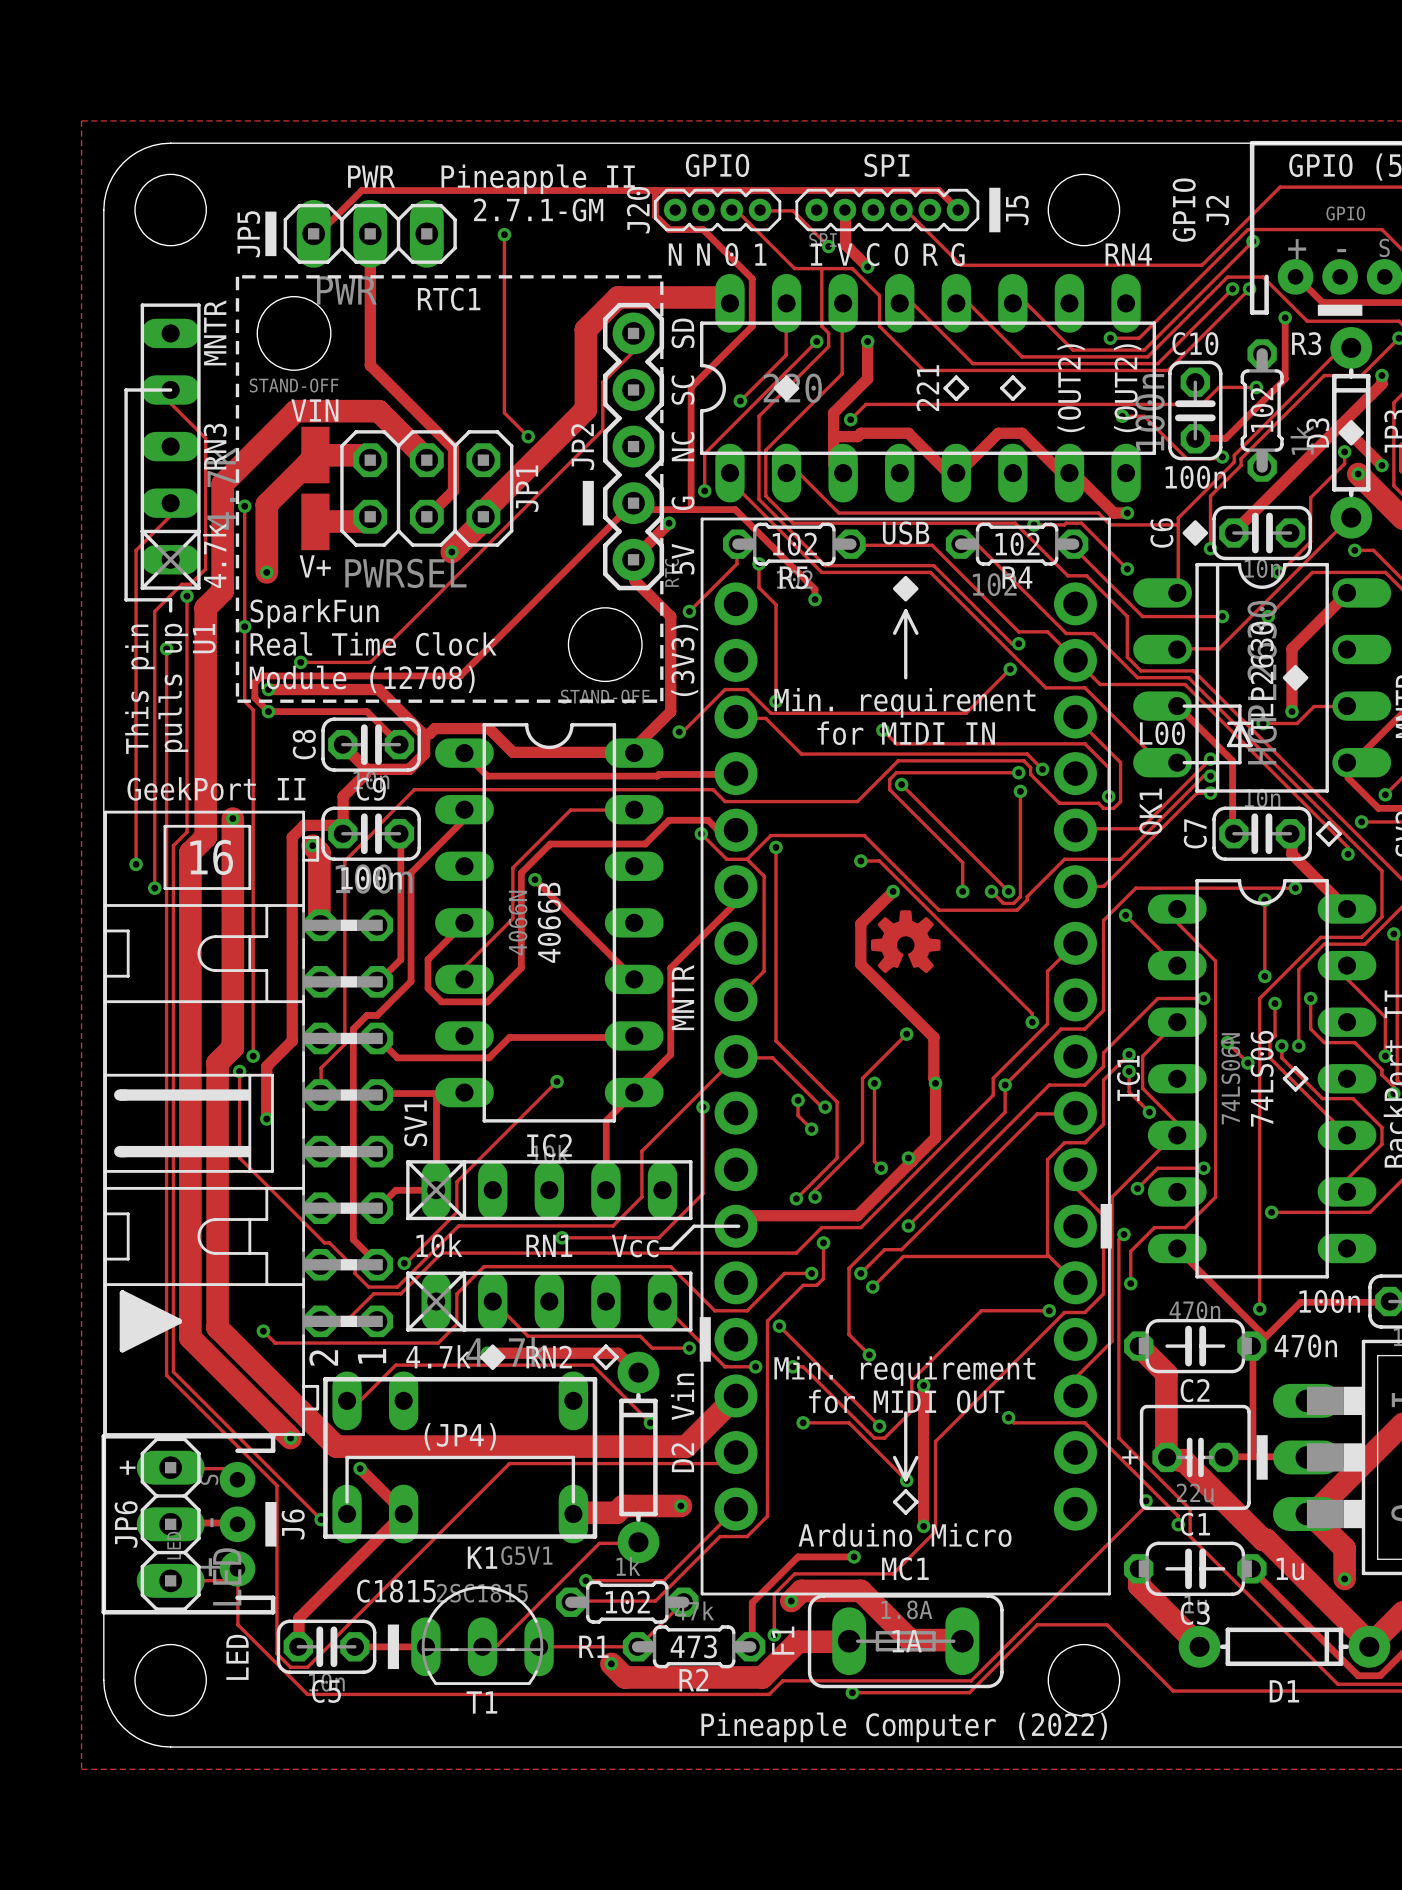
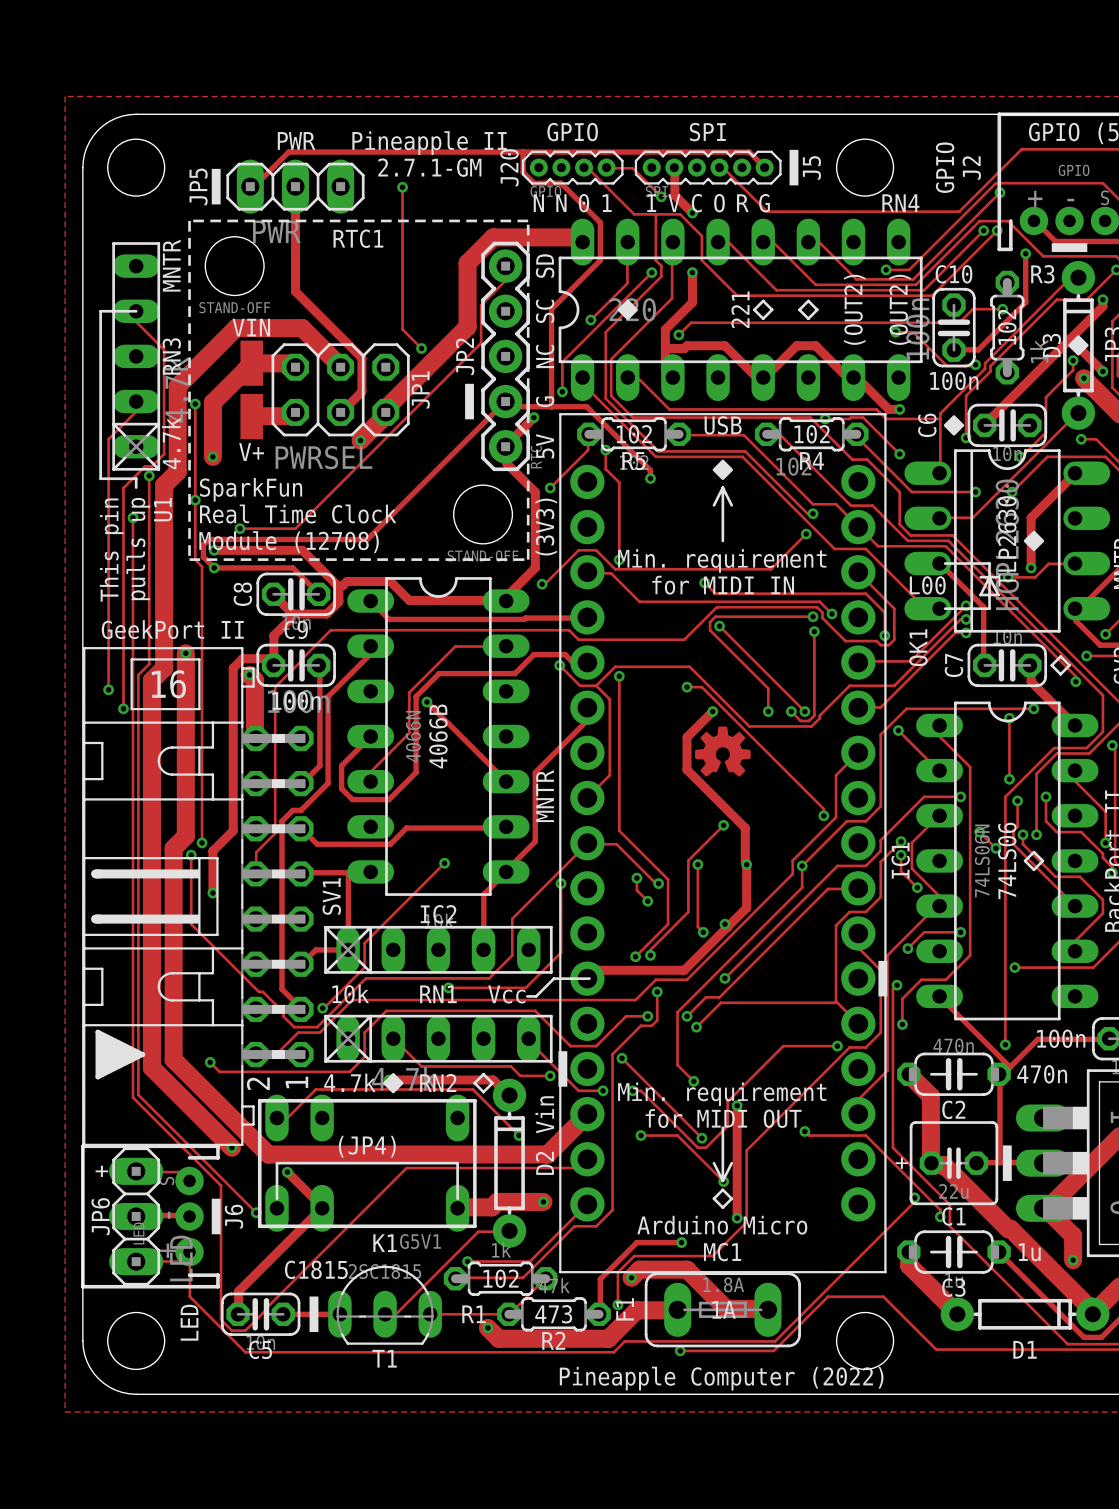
J20 value: none -> GPIO (545, 191)

